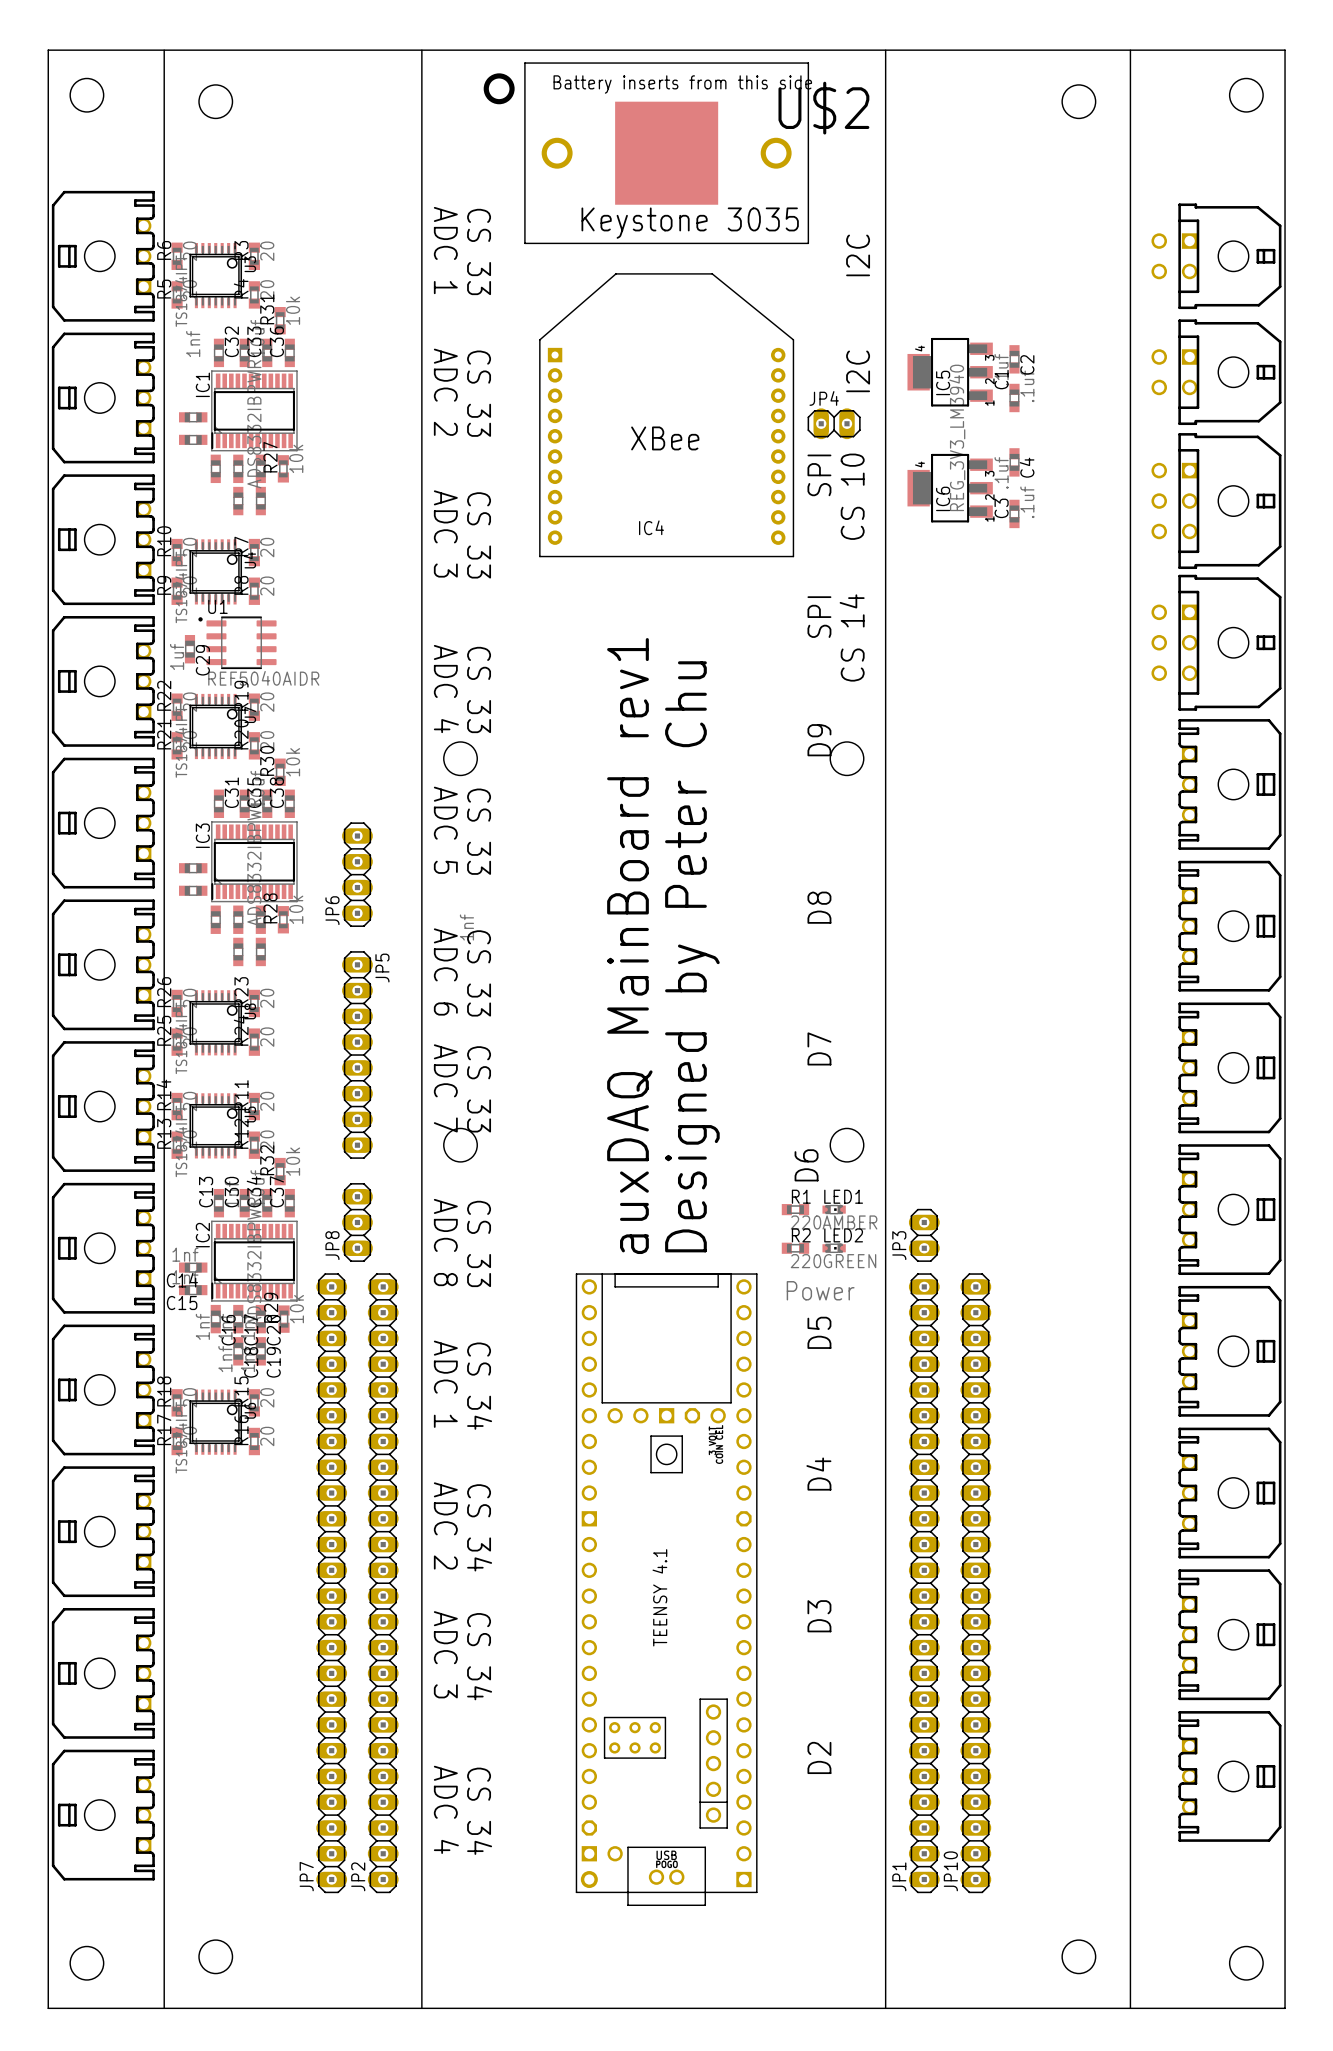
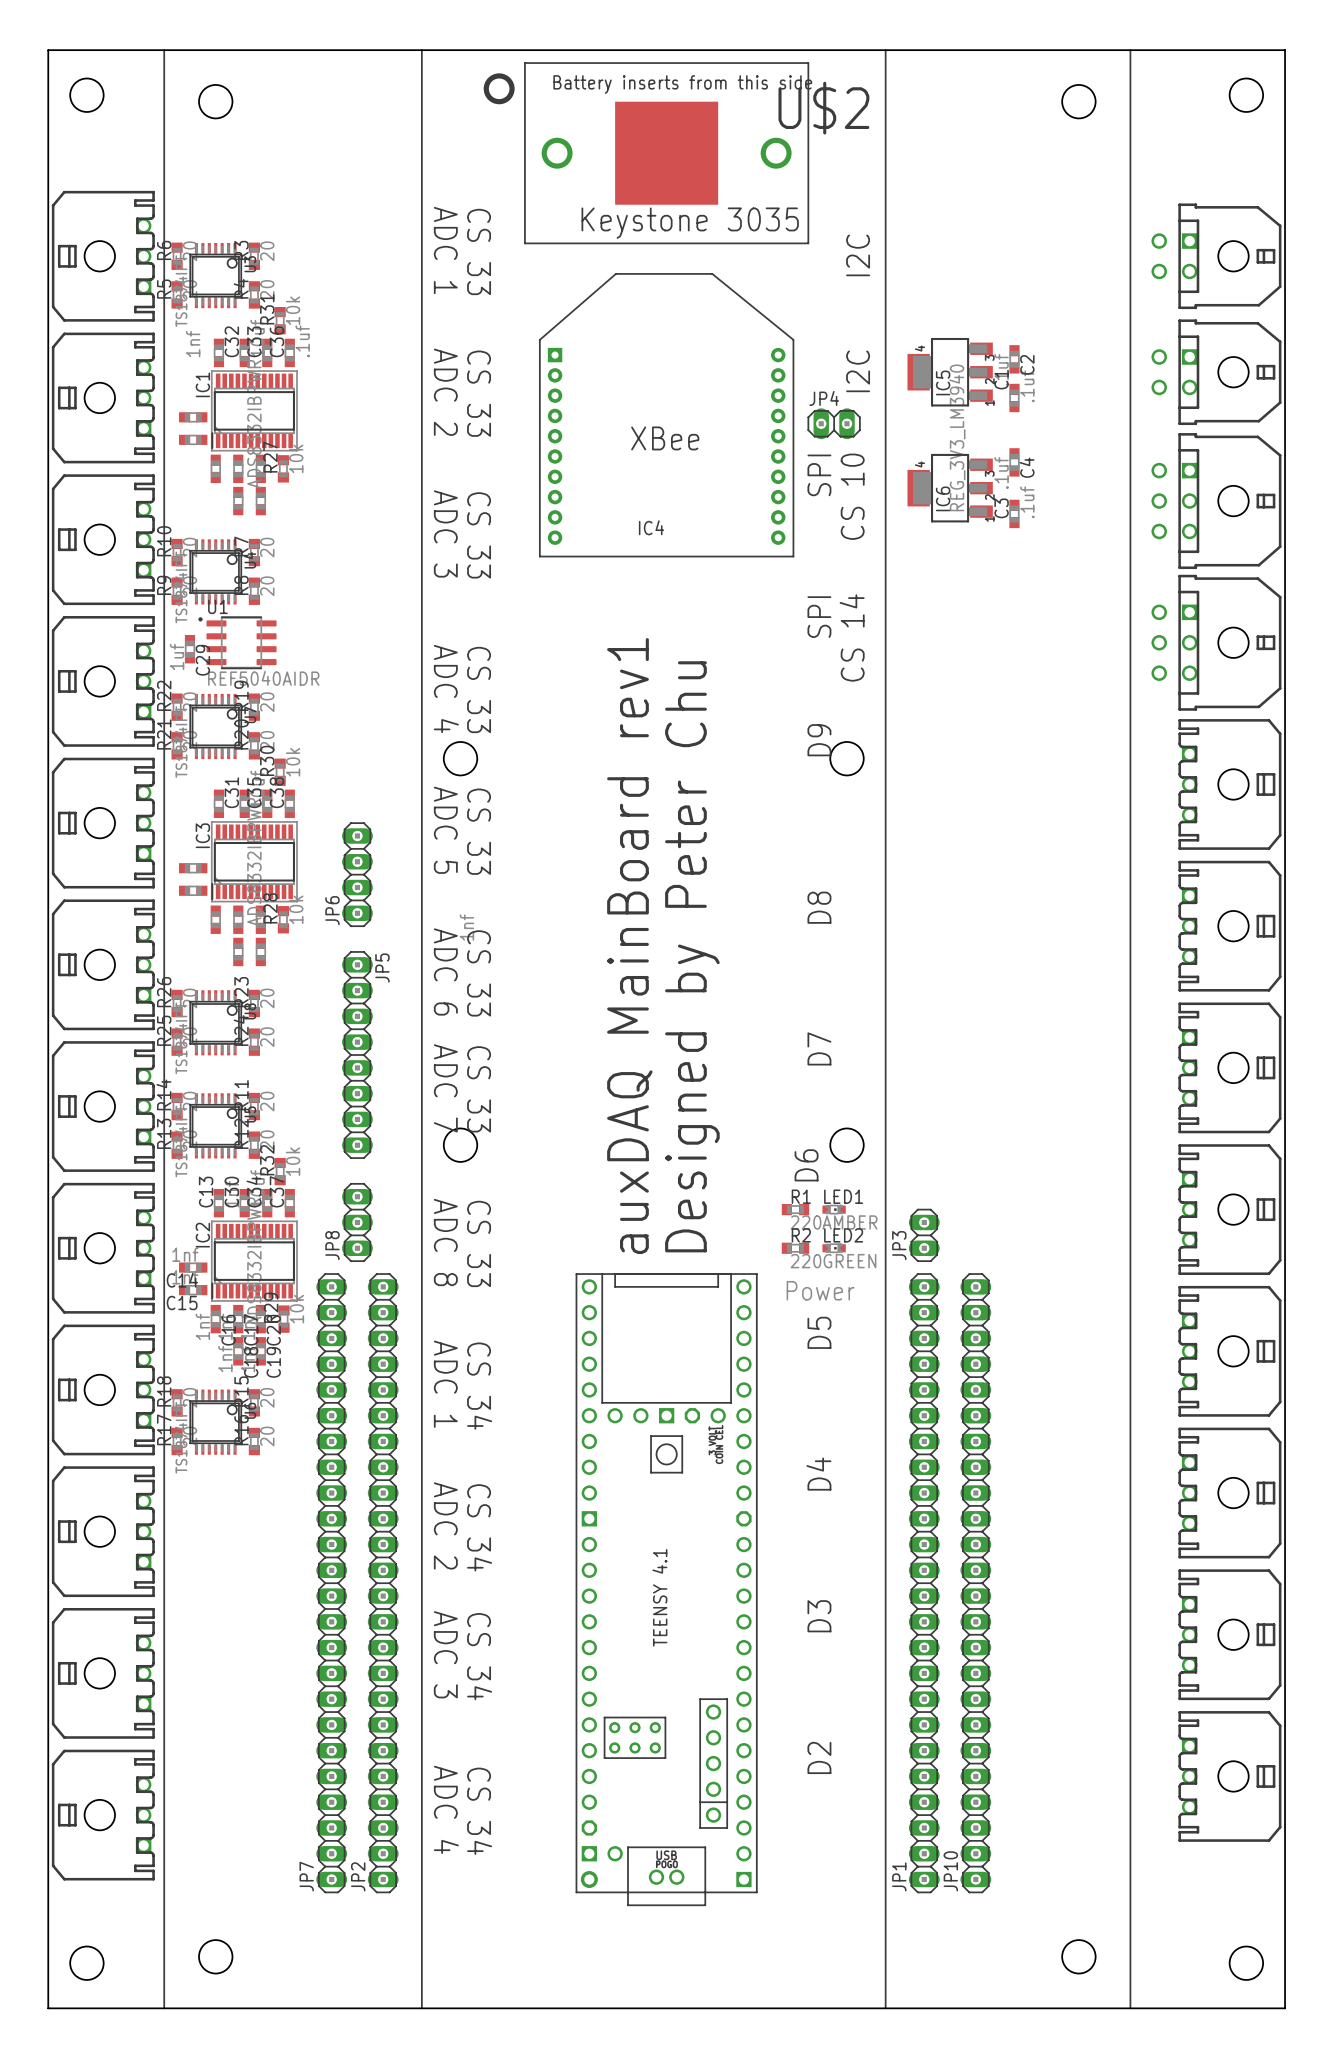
C36 value: none -> .1uf (302, 341)

